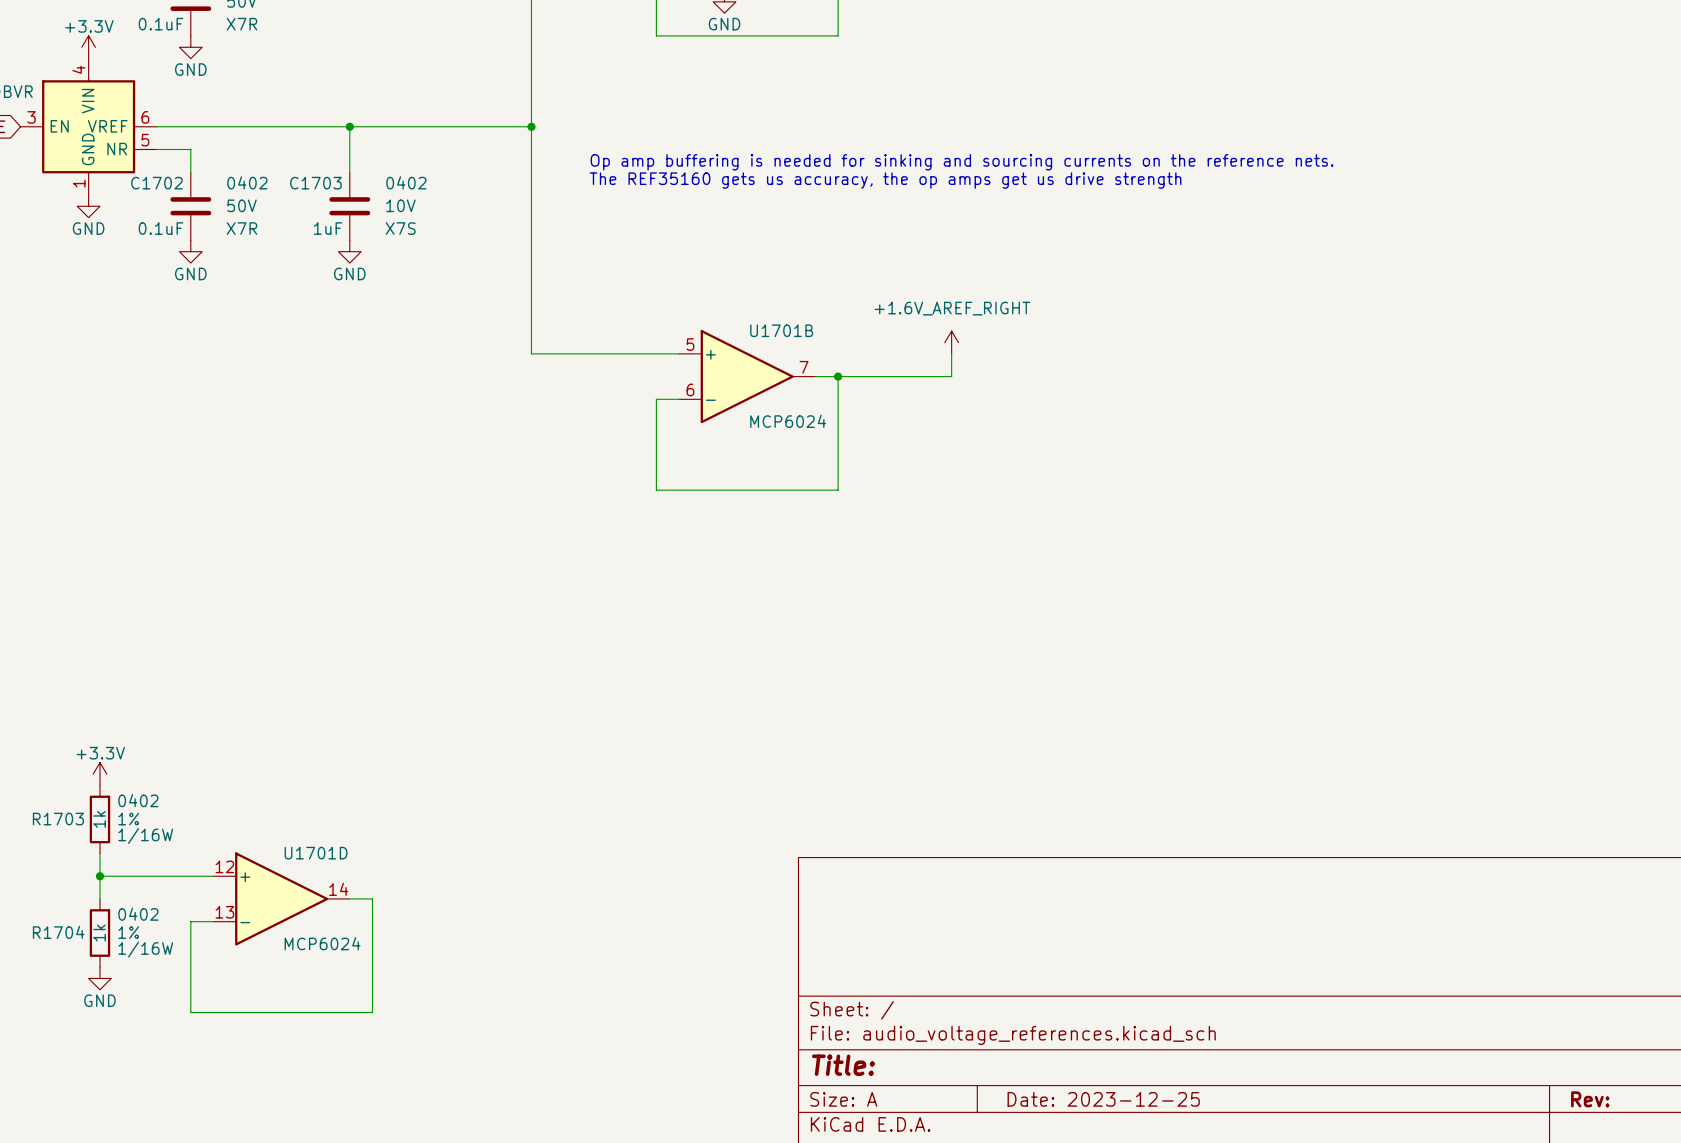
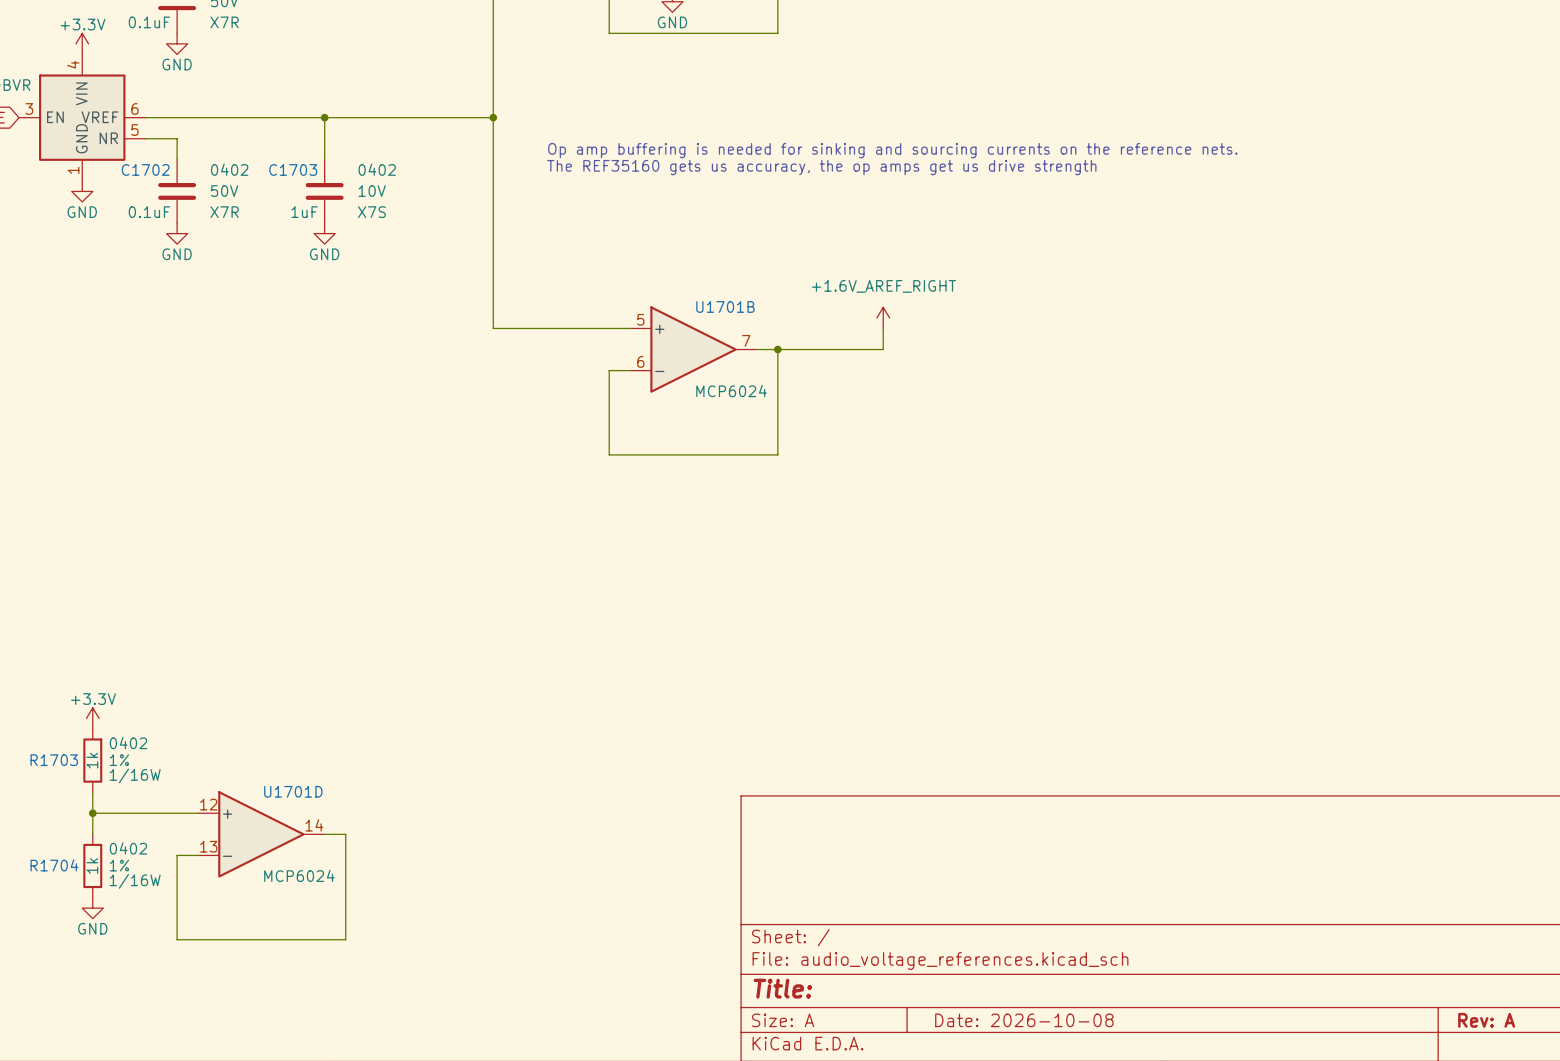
title block: Date: 2023-12-25 (1103, 1099) -> Date: 2026-10-08 (1024, 1020)
title block: Rev: (1590, 1099) -> Rev: A (1486, 1020)

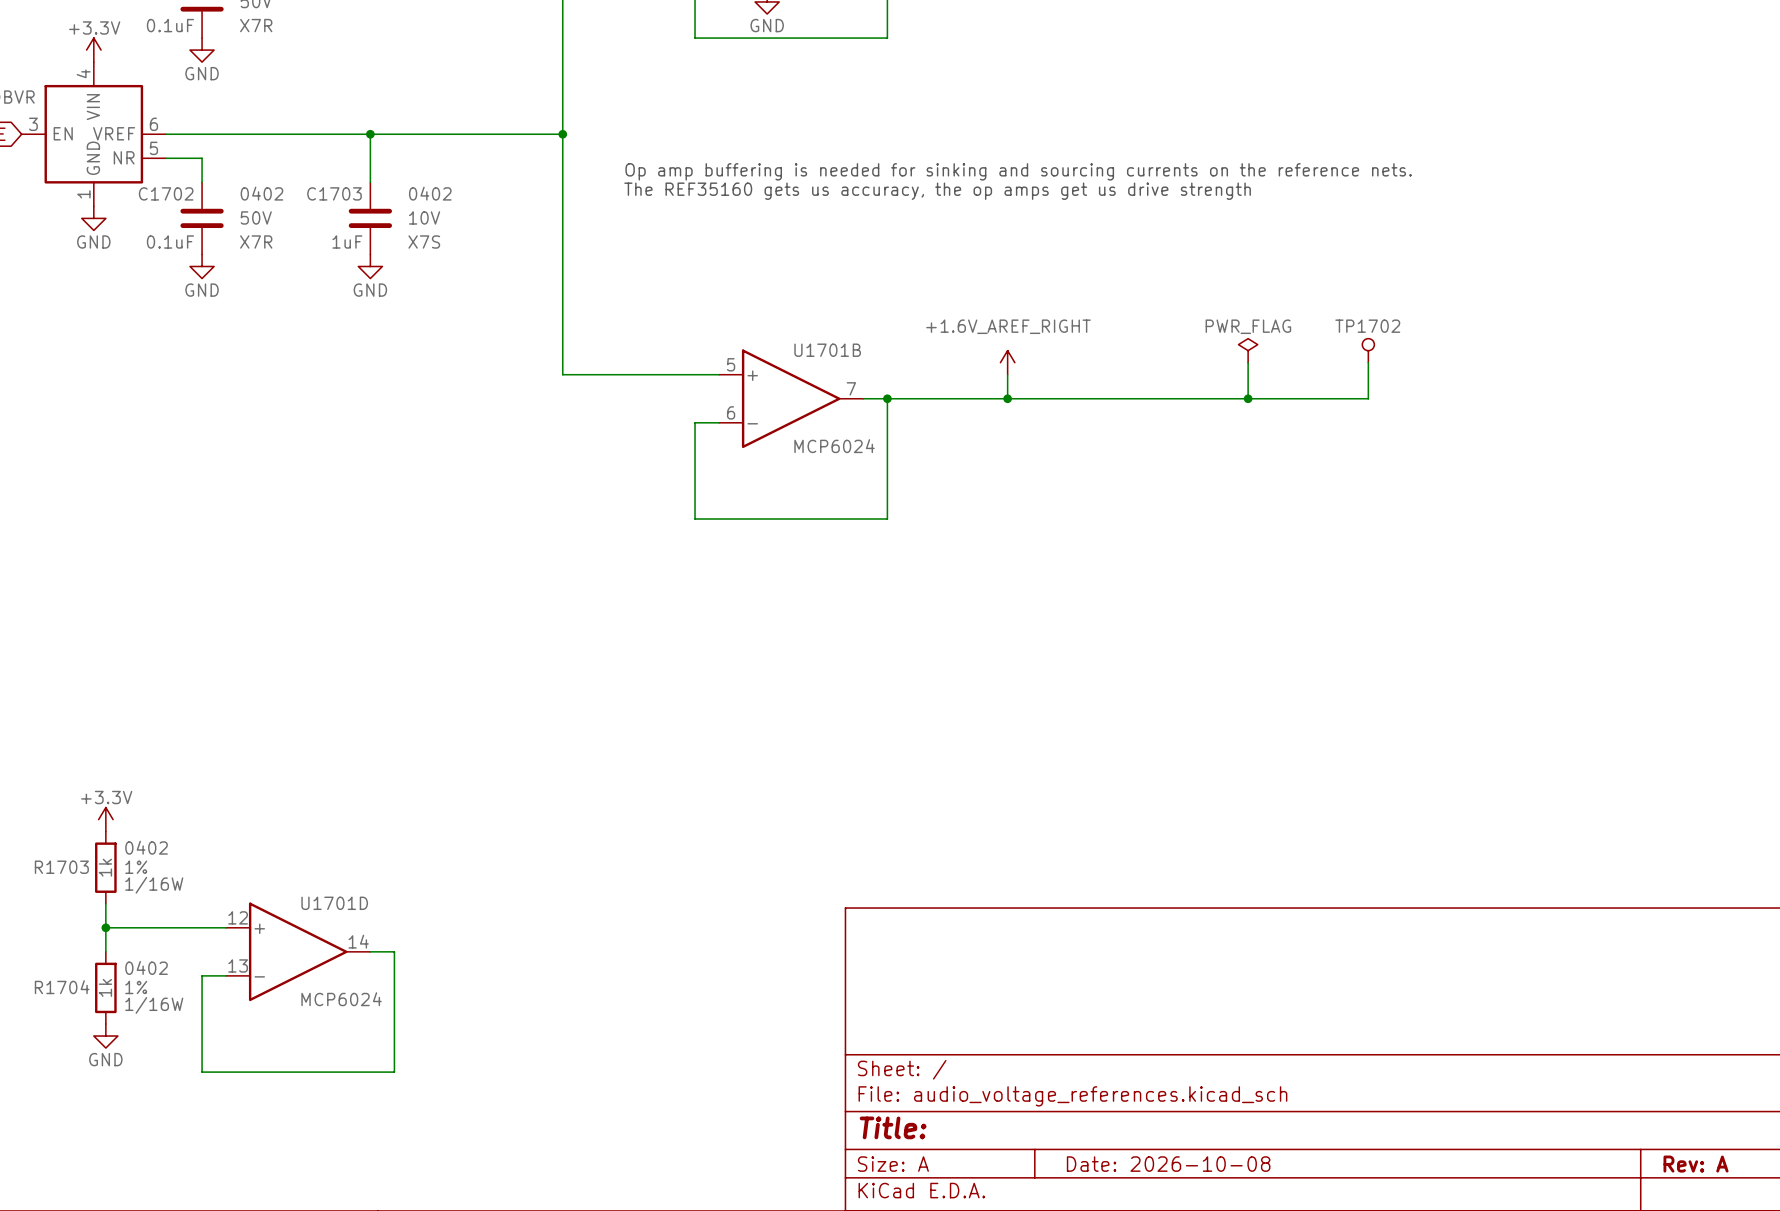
power symbol: none -> PWR_FLAG (1248, 350)
TP1702: none -> (1368, 350)
wire: none -> (1248, 362) (1248, 398)
wire: none -> (1368, 362) (1368, 398) (1007, 398)
junction: none -> (1007, 398)
junction: none -> (1248, 398)

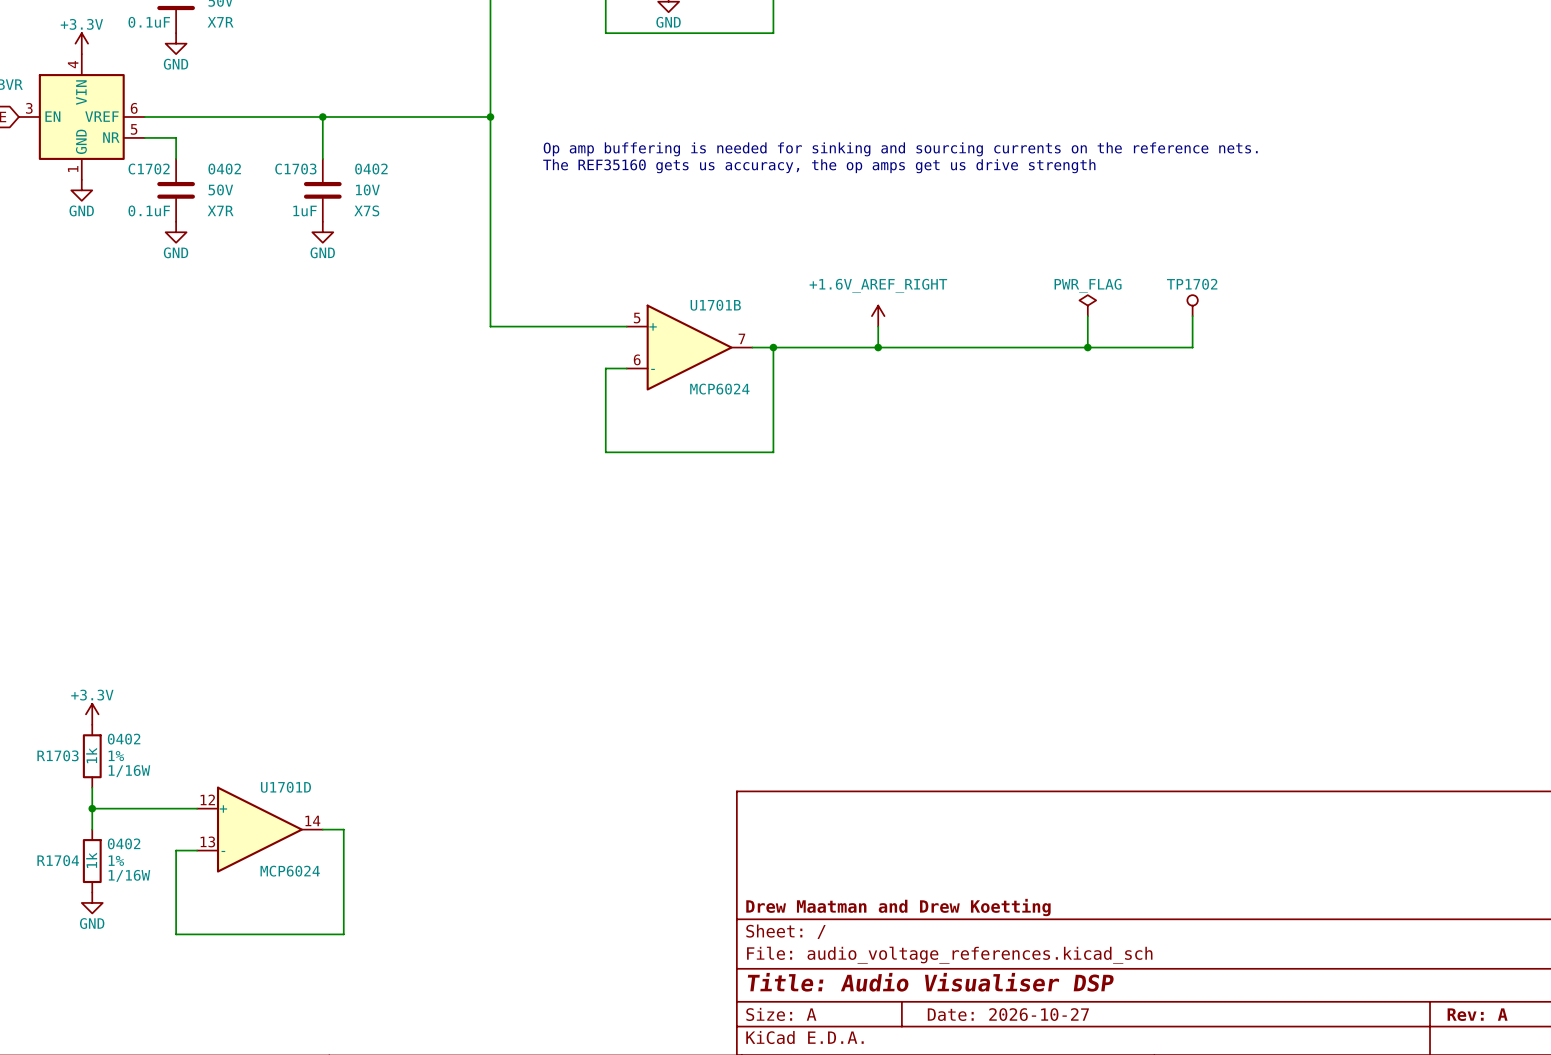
title block: none -> Drew Maatman and Drew Koetting (898, 907)
title block: Title: (893, 1127) -> Title: Audio Visualiser DSP (930, 982)
title block: Date: 2026-10-08 (1168, 1164) -> Date: 2026-10-27 (1008, 1014)

